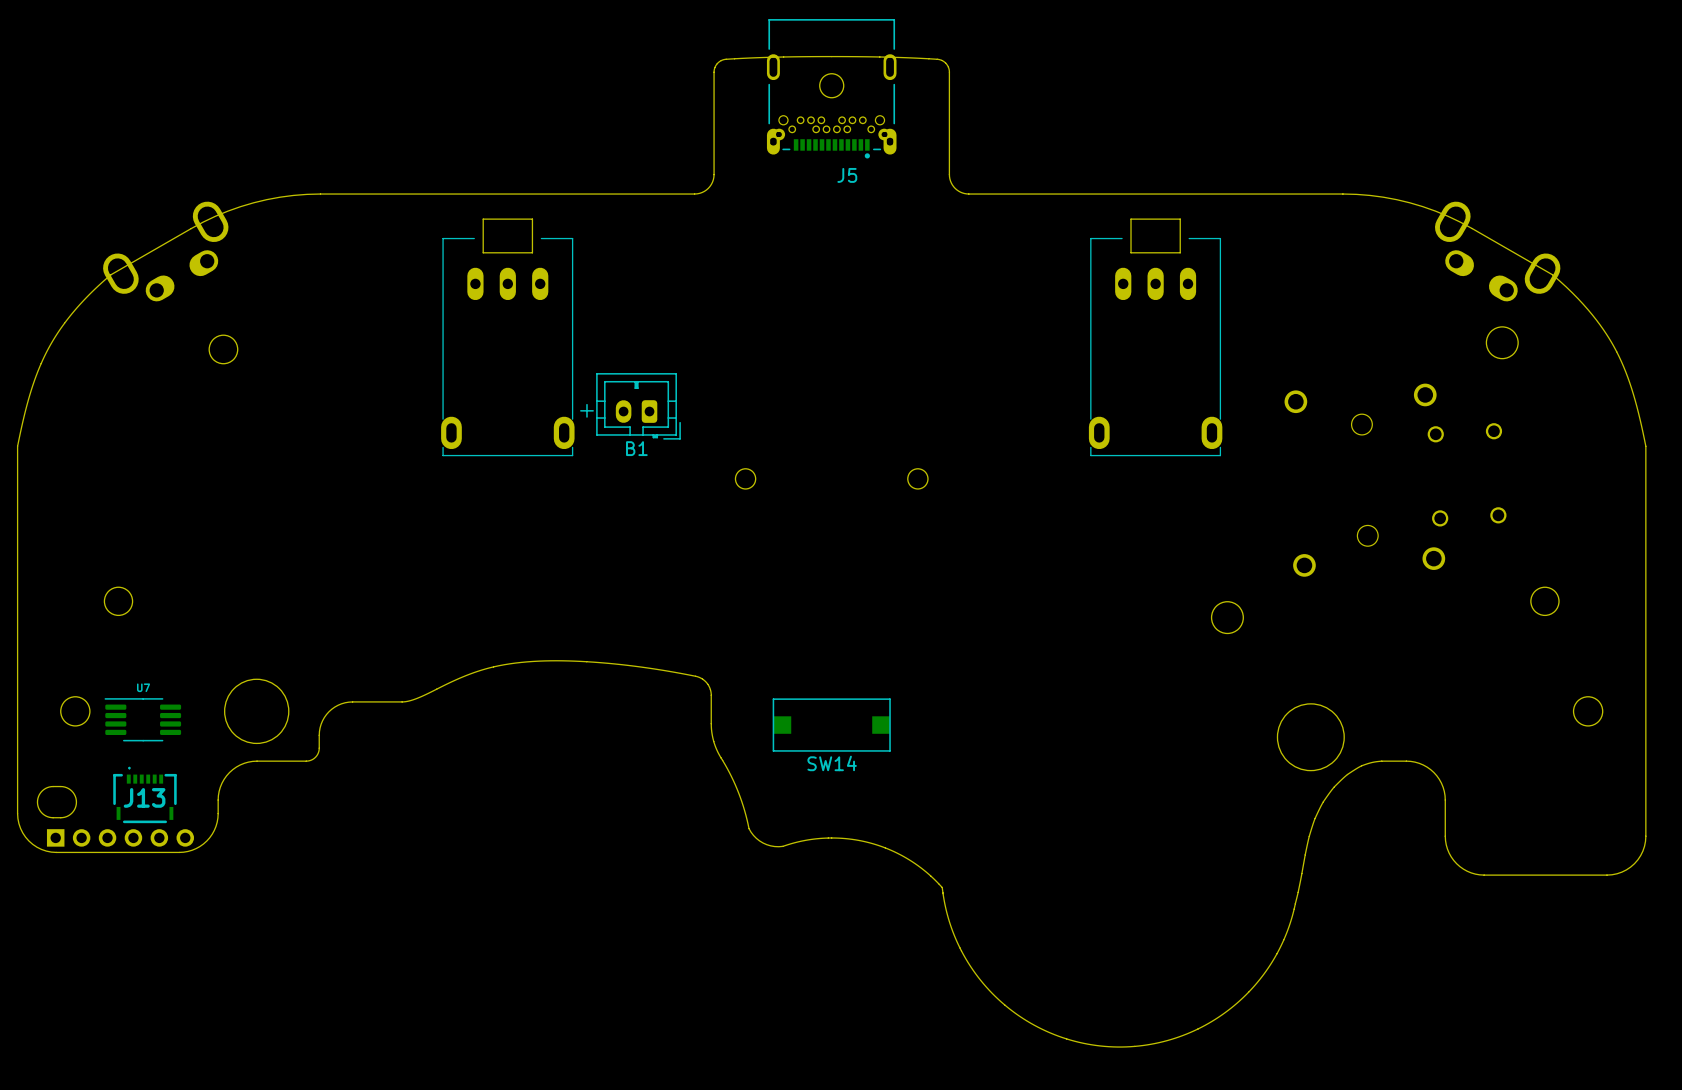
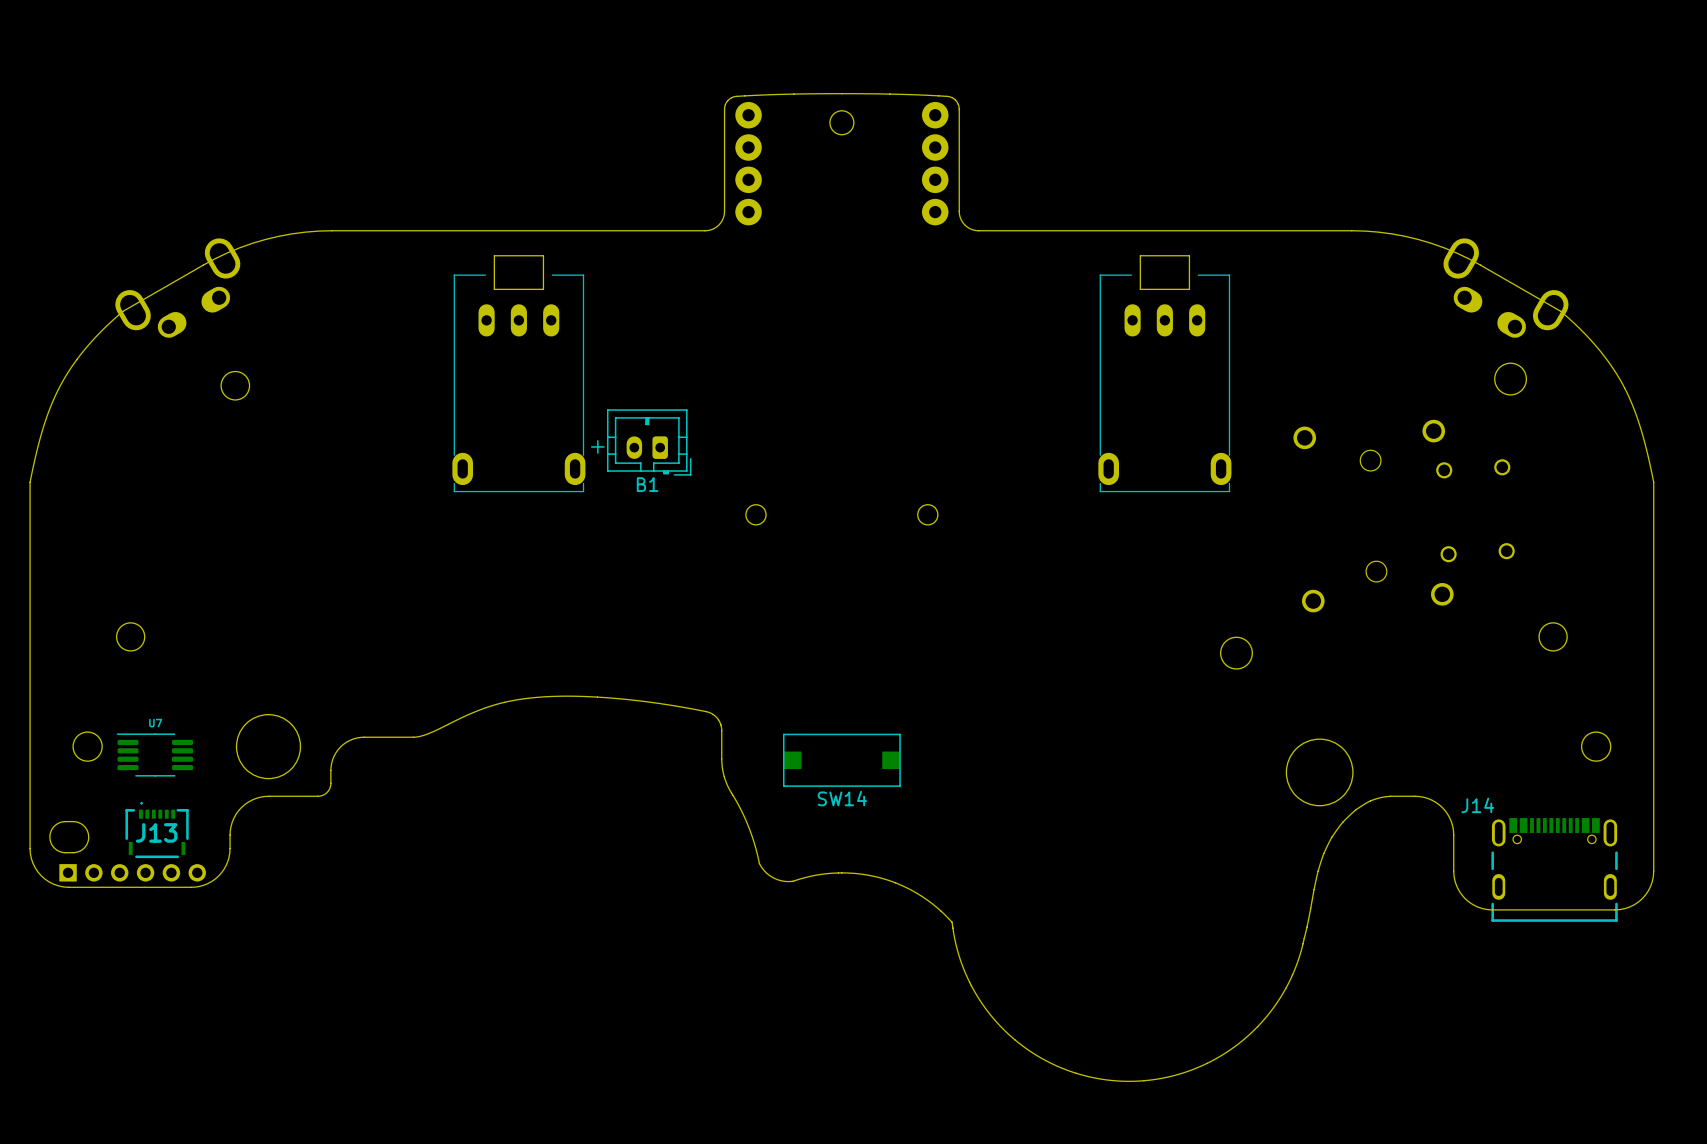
part: none -> (748, 115)
part: none -> (935, 115)
J5: (831, 88) -> none
part: none -> (748, 147)
part: none -> (935, 147)
part: none -> (748, 179)
part: none -> (935, 179)
part: none -> (748, 212)
part: none -> (935, 212)
J14: none -> (1554, 869)

